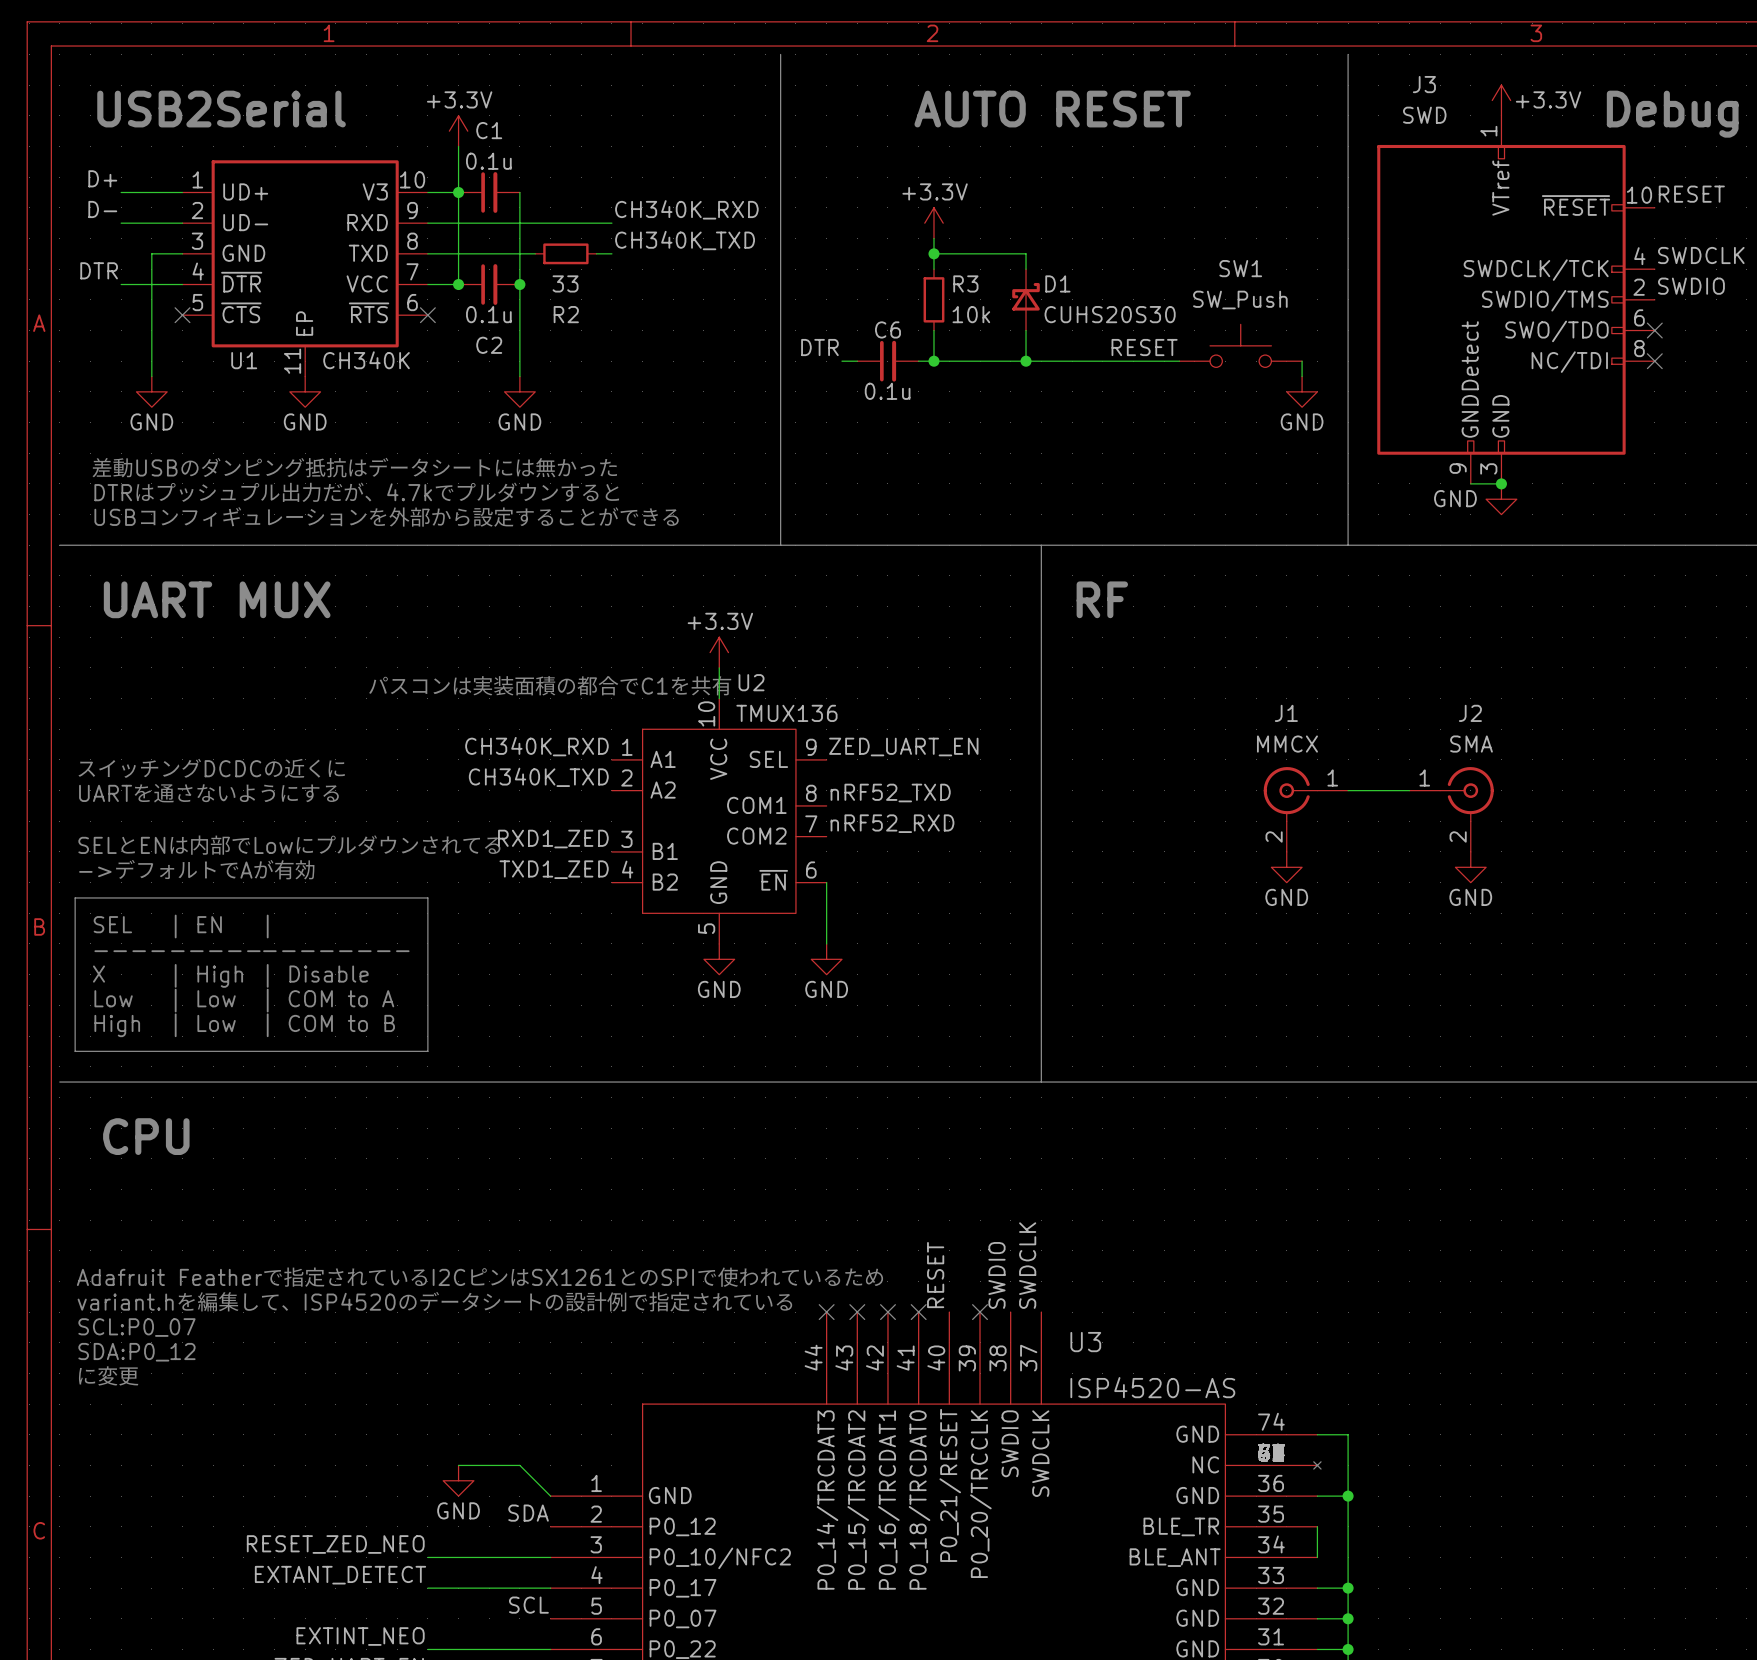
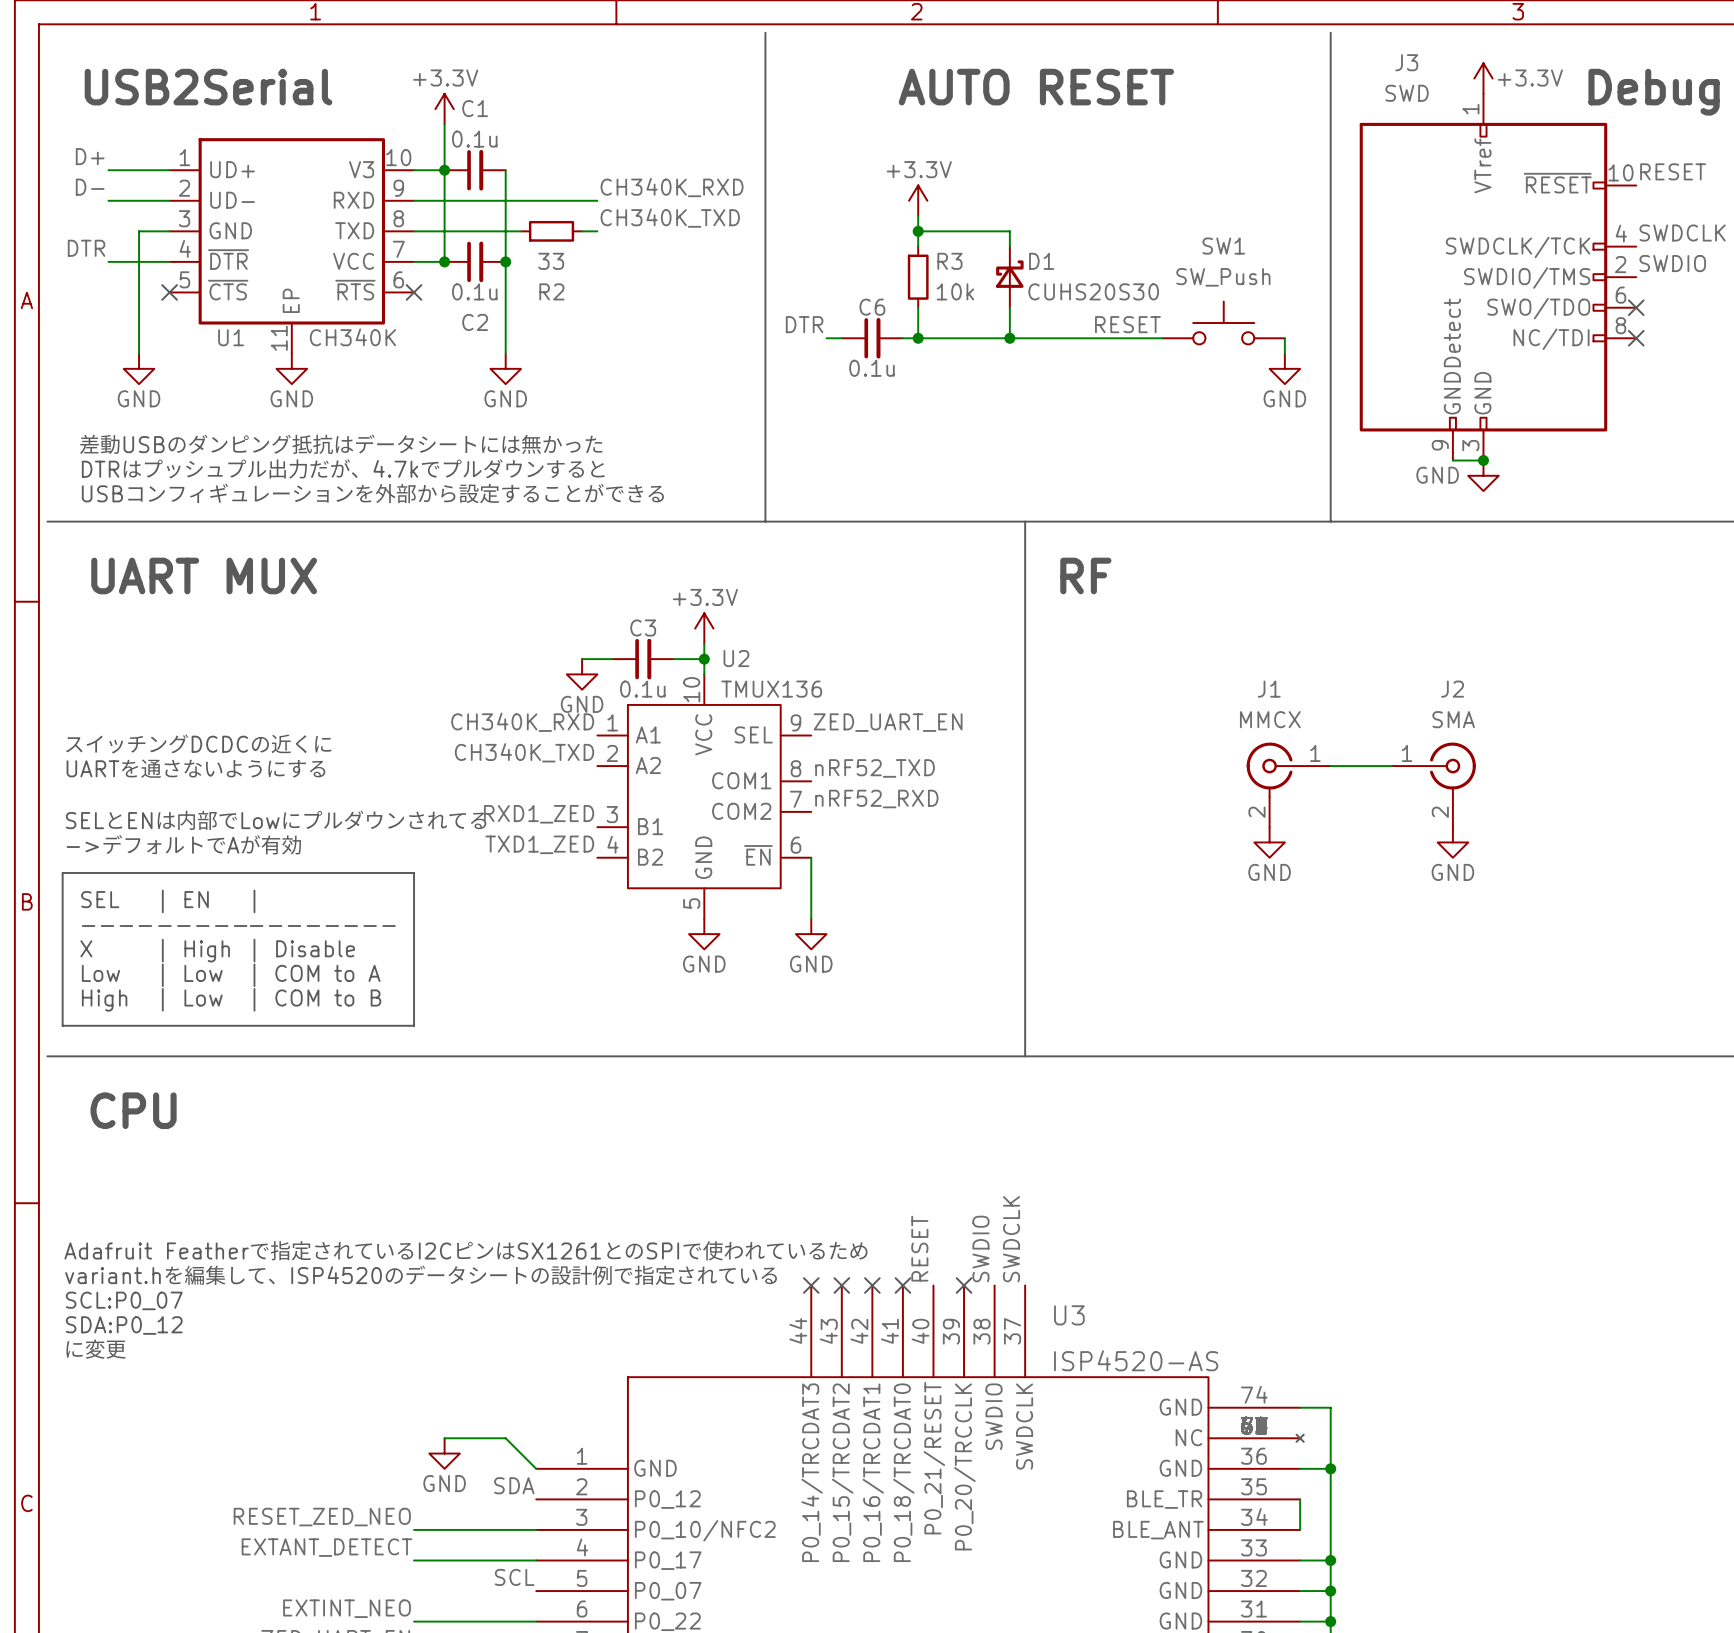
wire: none -> (582, 659) (612, 659)
C3: none -> 0.1u (643, 659)
wire: none -> (673, 659) (704, 659)
junction: none -> (704, 659)
text: パスコンは実装面積の都合でC1を共有 (550, 685) -> none
power symbol: none -> GND (582, 674)

